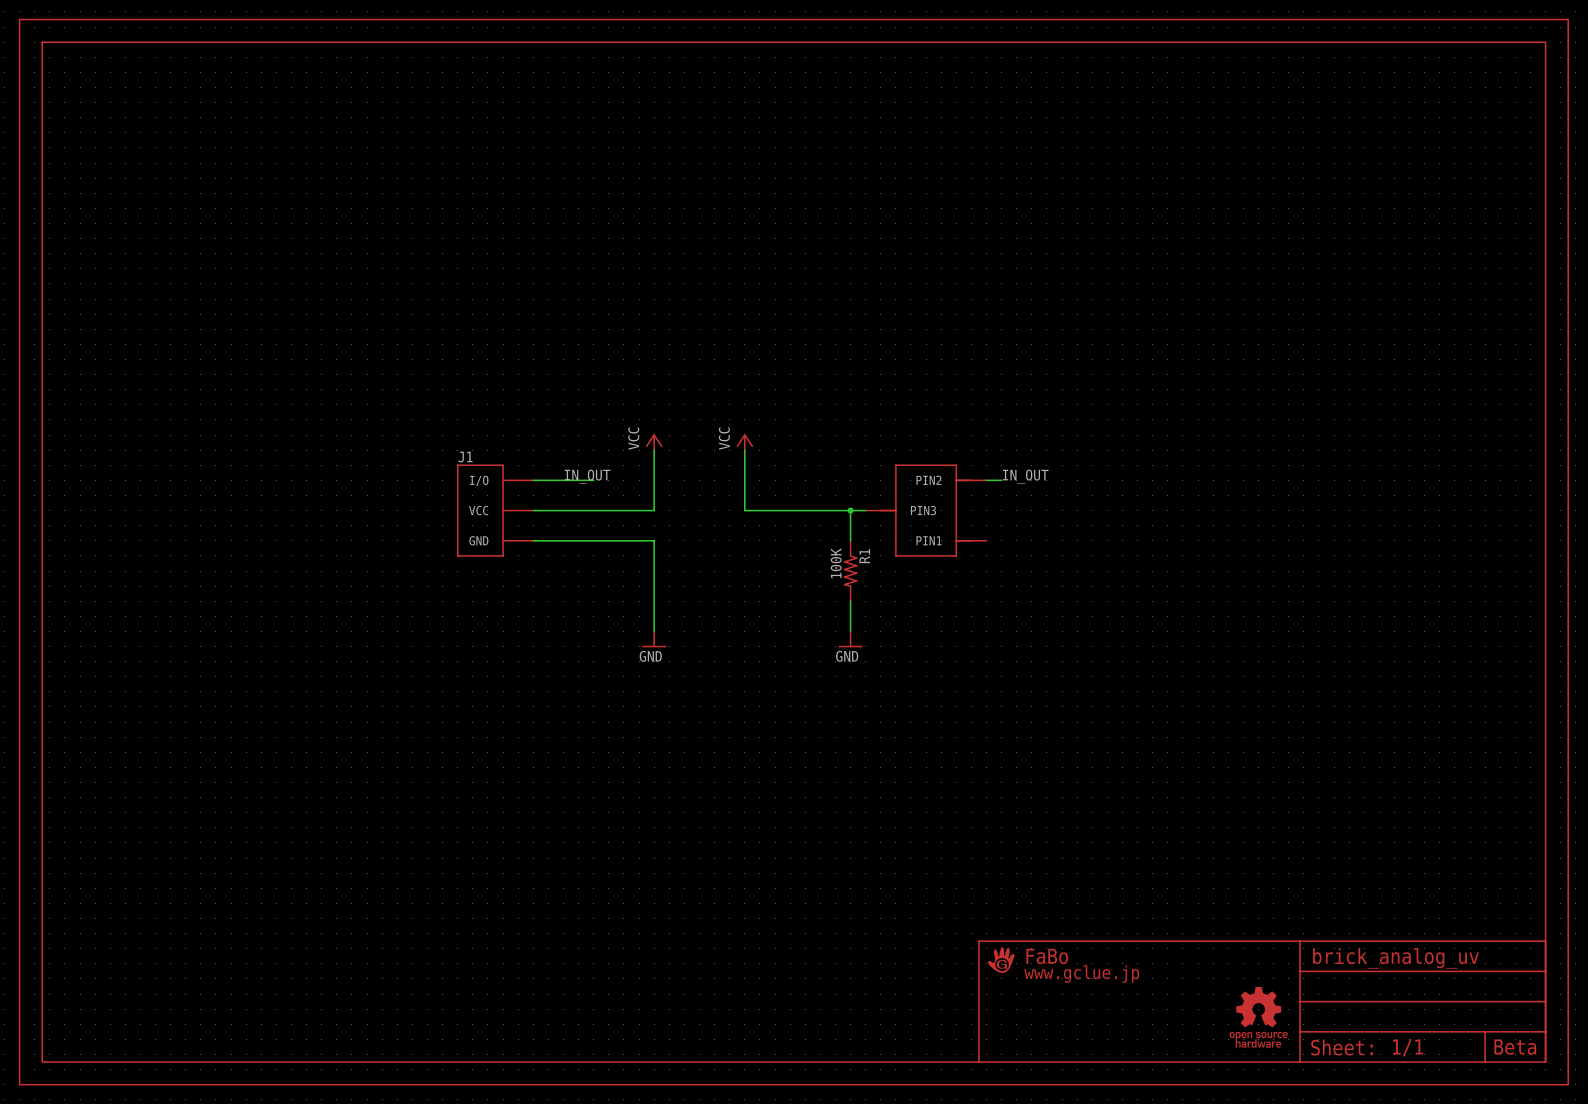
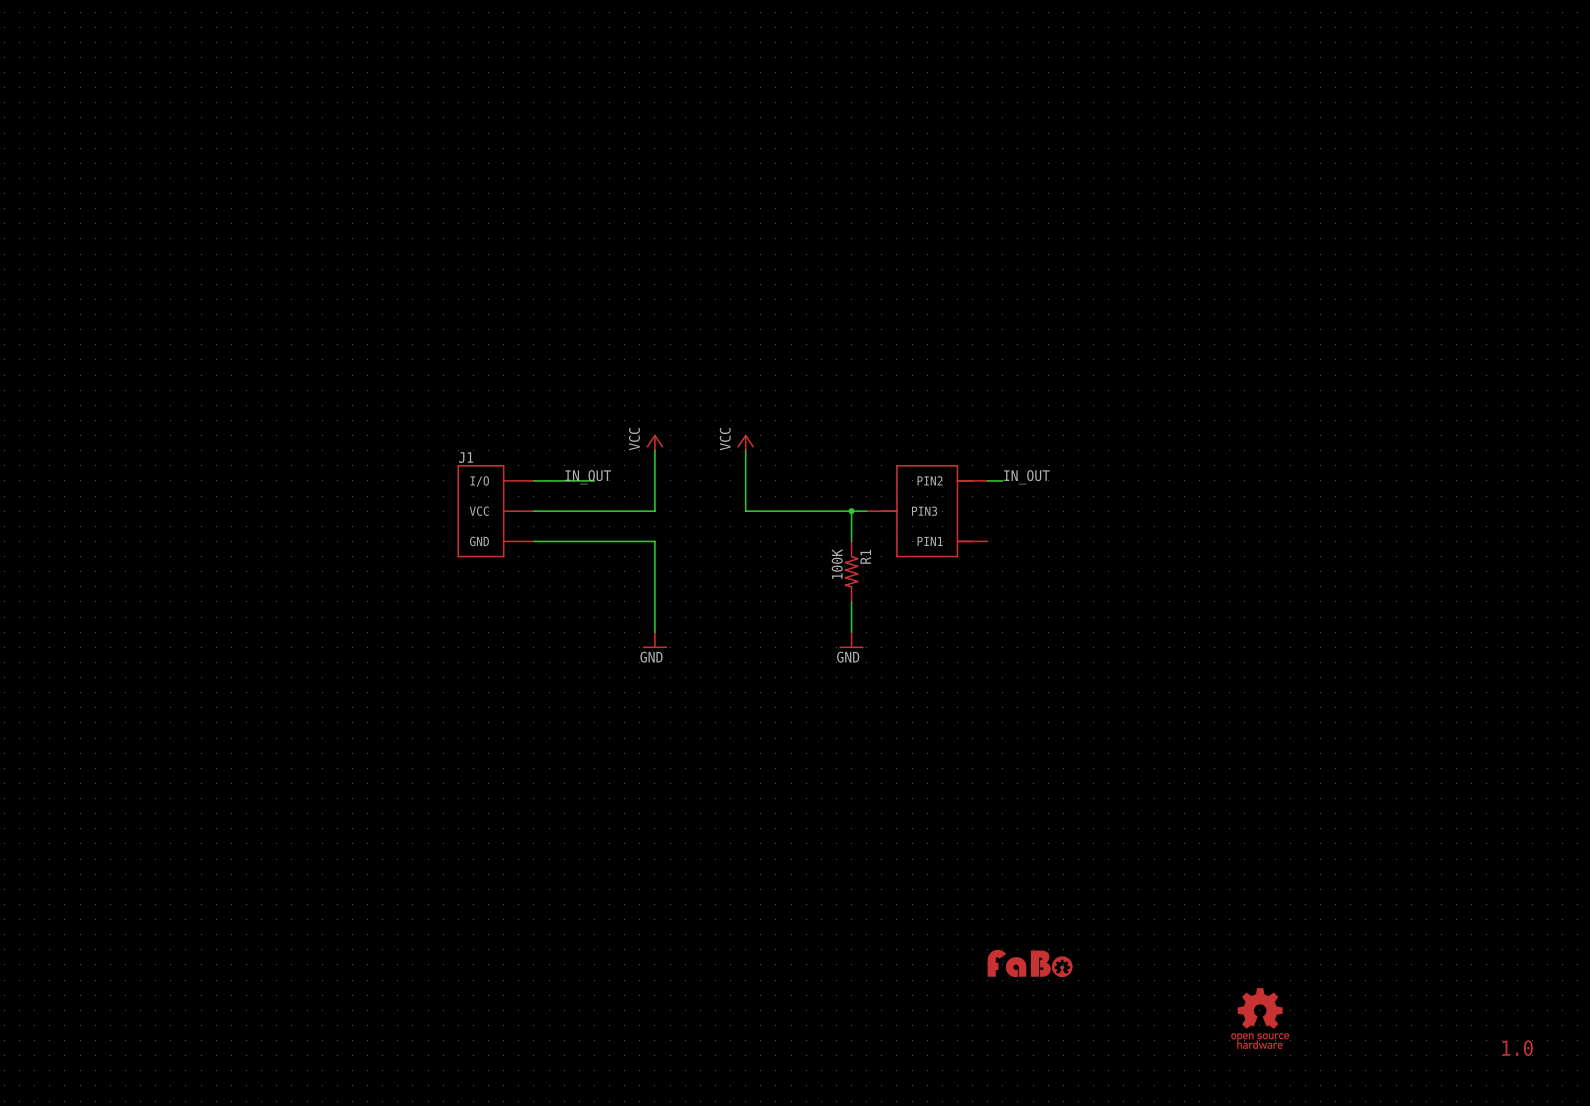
part: (793, 552) -> none
part: none -> (1030, 963)
text: Beta (1515, 1047) -> 1.0 (1517, 1048)

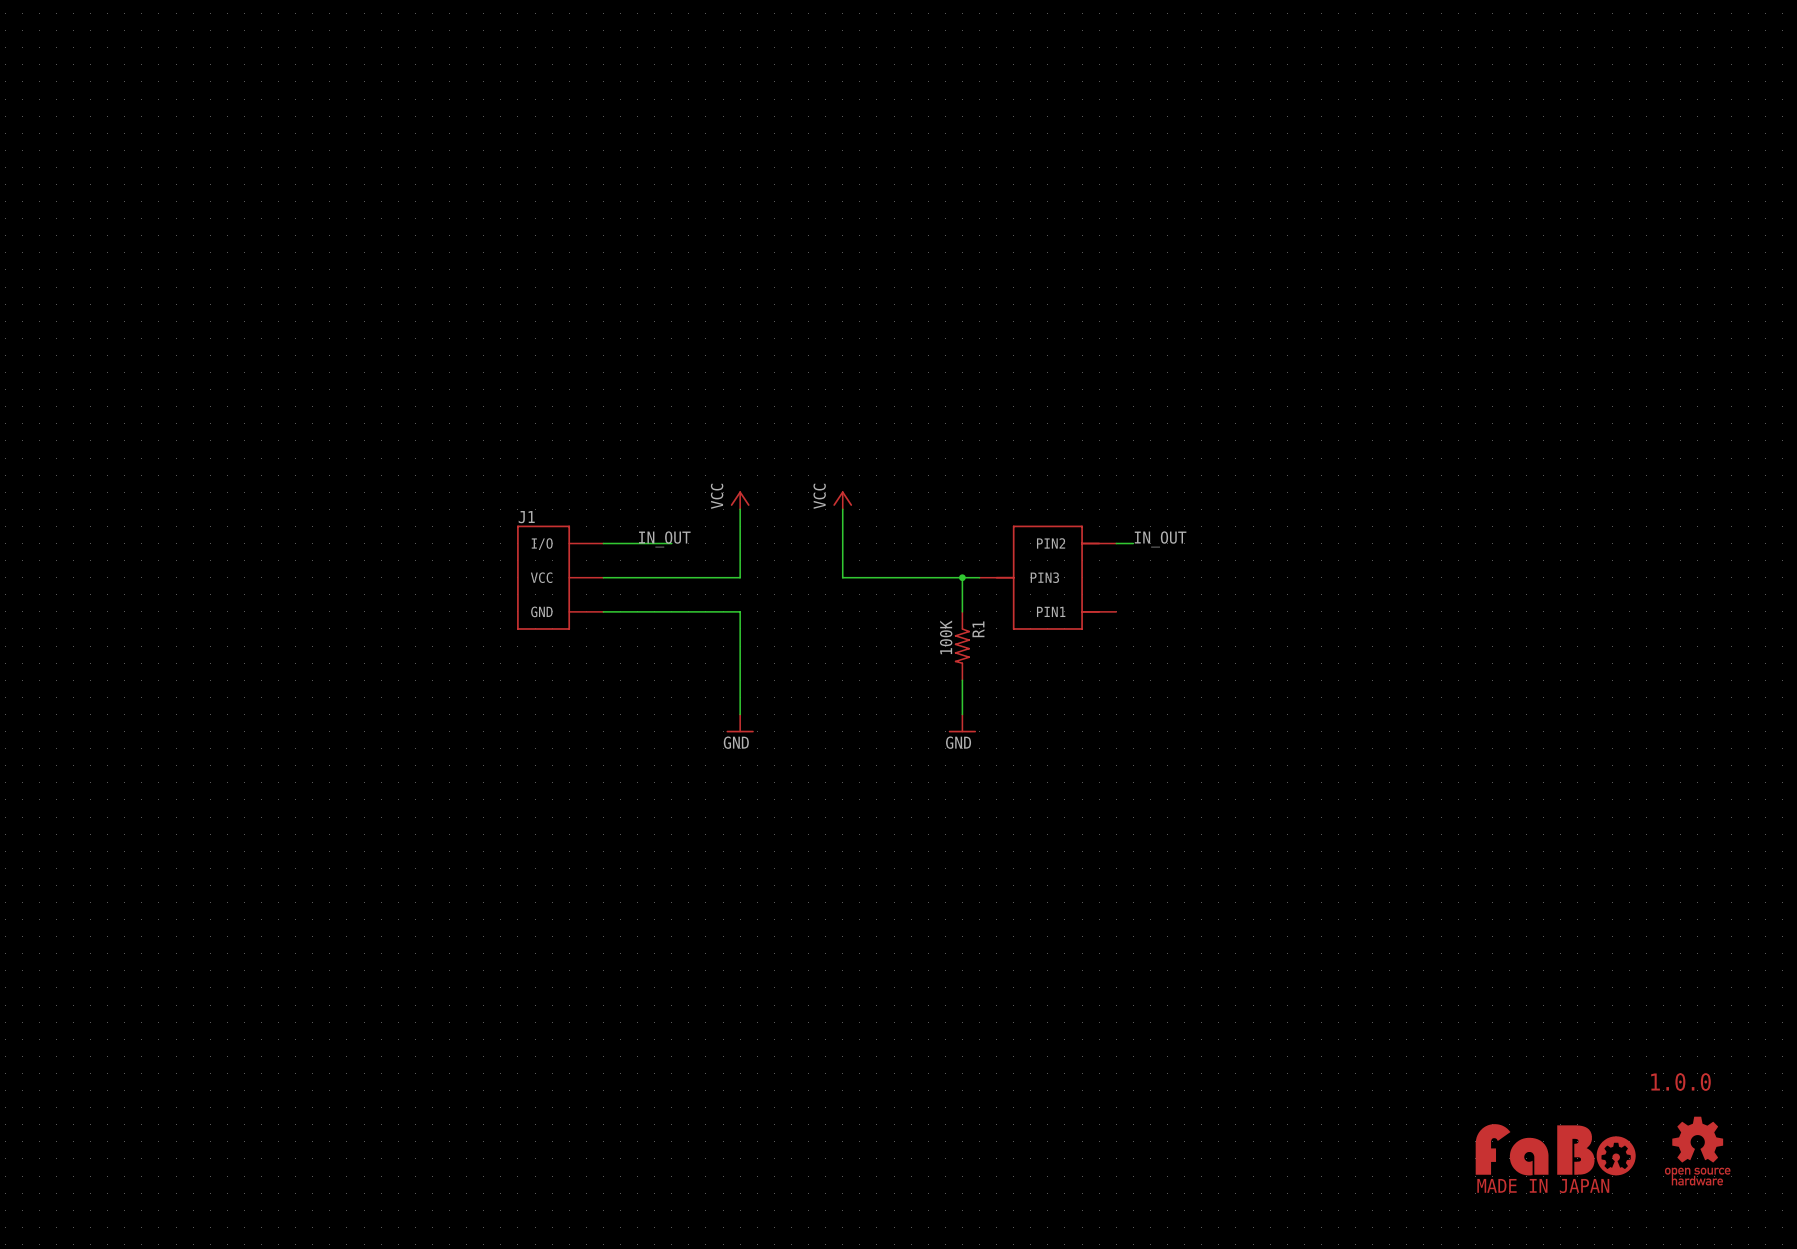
text: none -> 1.0.0 (1680, 1082)
part: (1030, 963) -> none
part: none -> (1555, 1149)
part: (1260, 1018) -> none
part: none -> (1697, 1151)
text: 1.0 (1517, 1048) -> none

